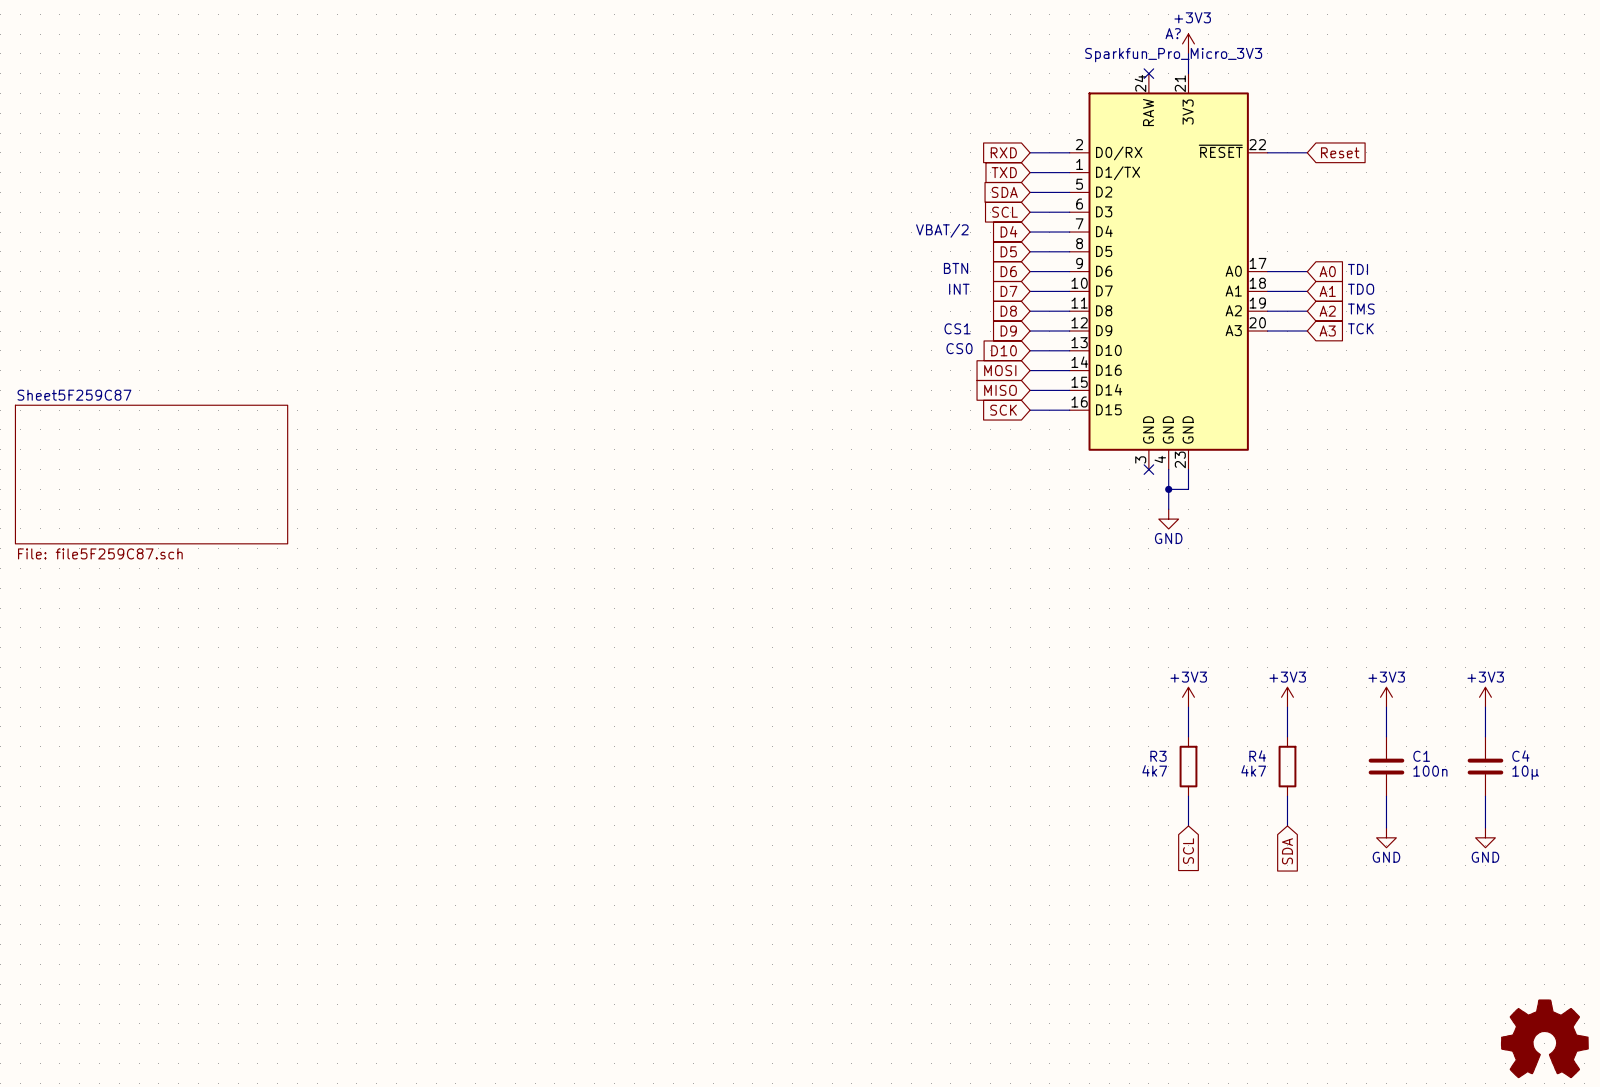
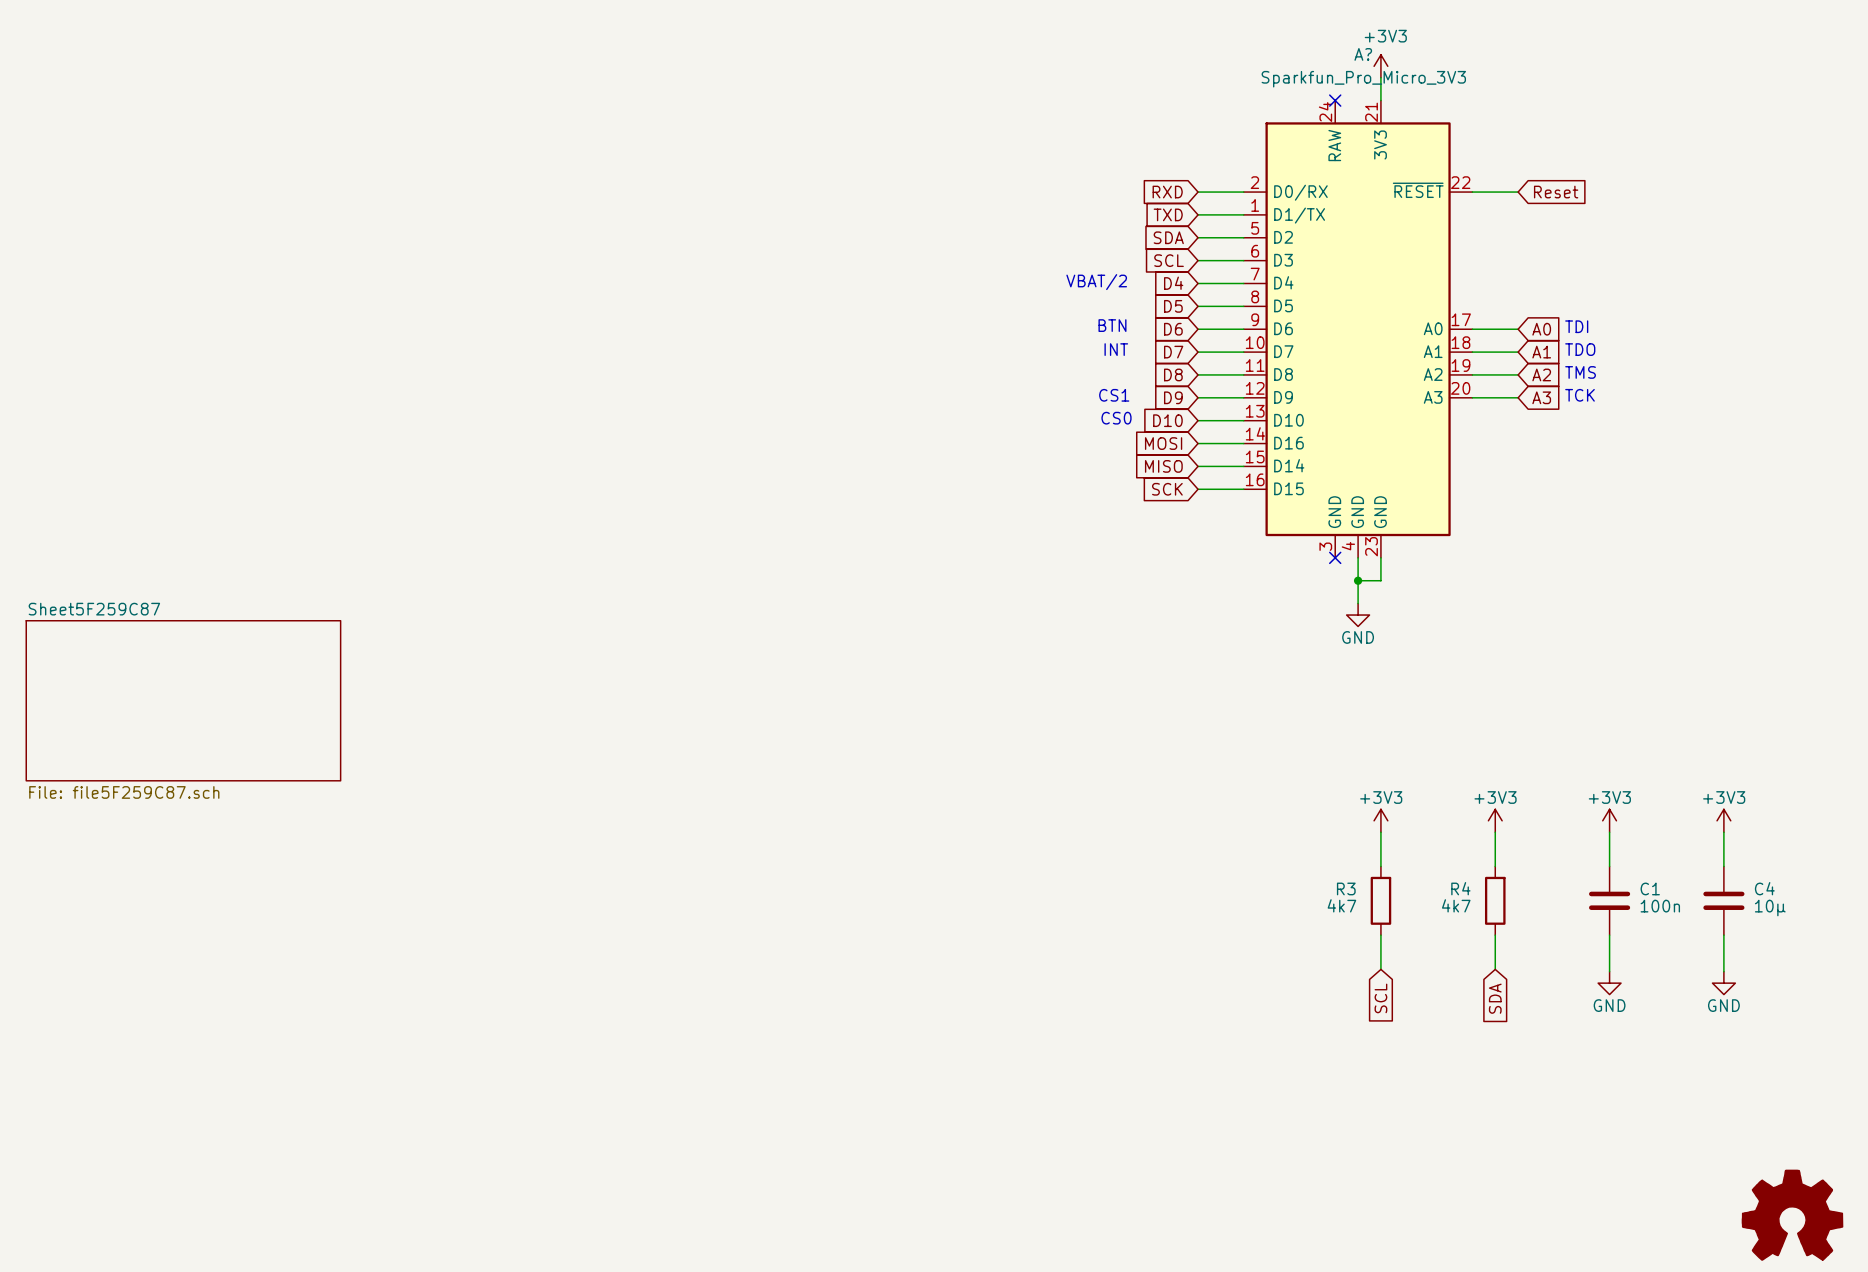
sheet Sheet5F259C87 position: (151, 474) -> (183, 700)

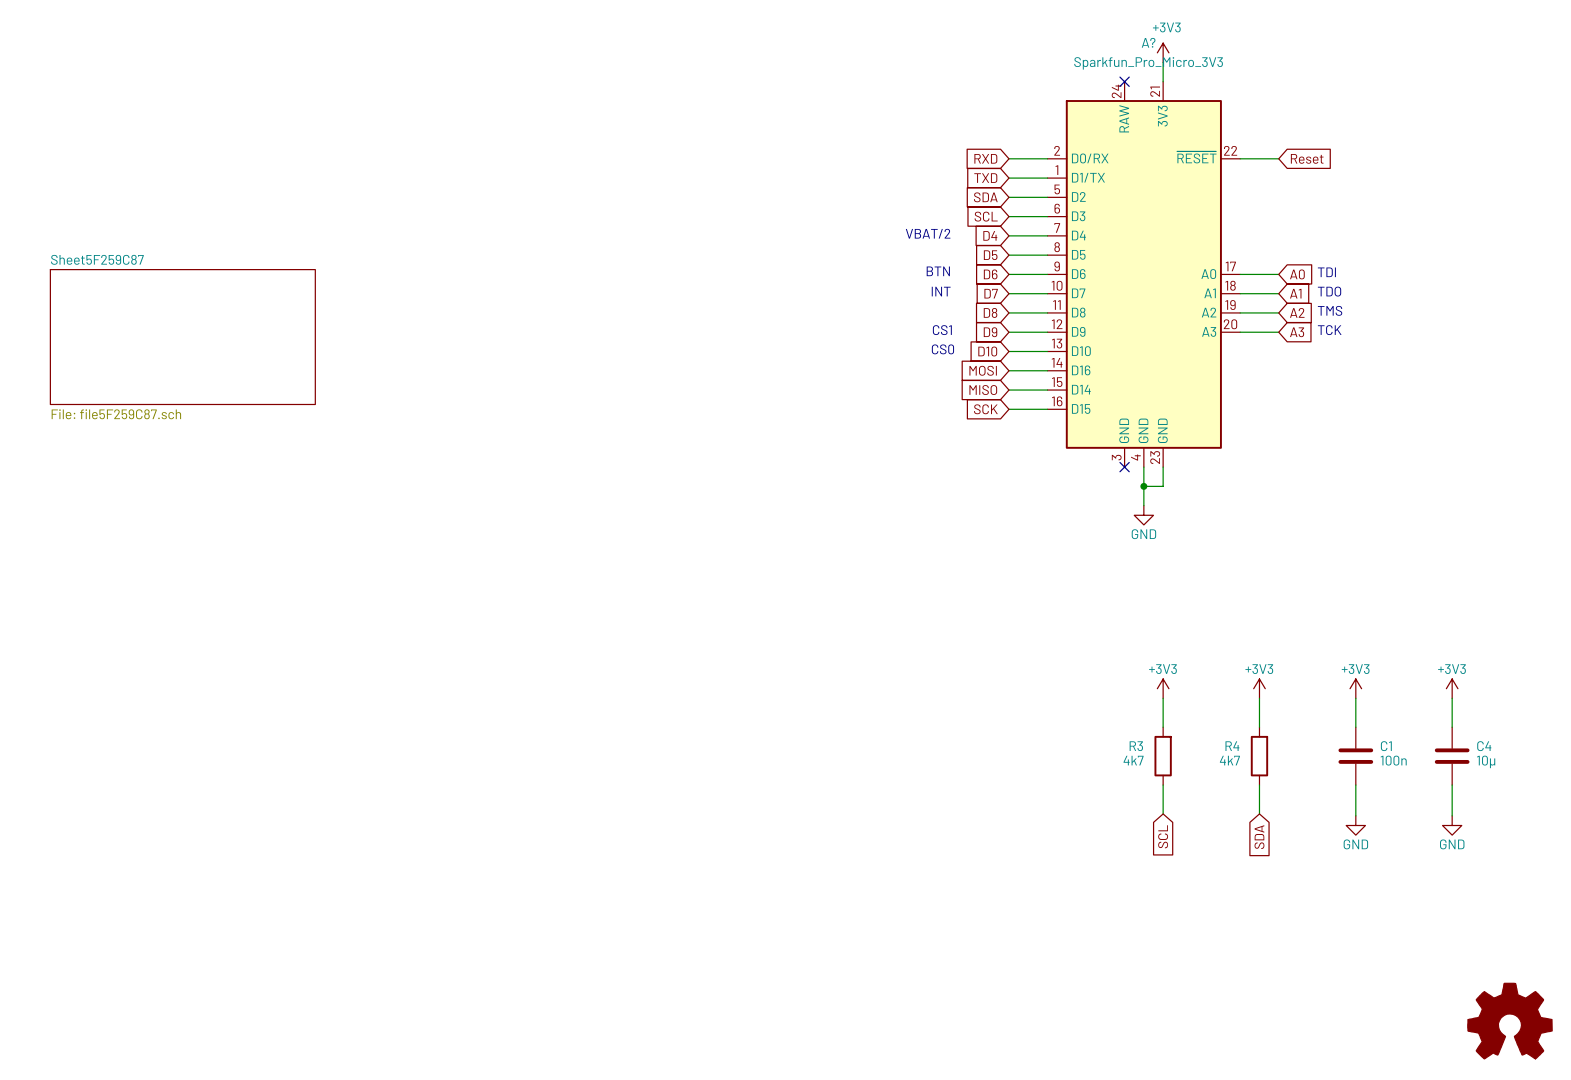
sheet Sheet5F259C87 position: (183, 700) -> (182, 337)

